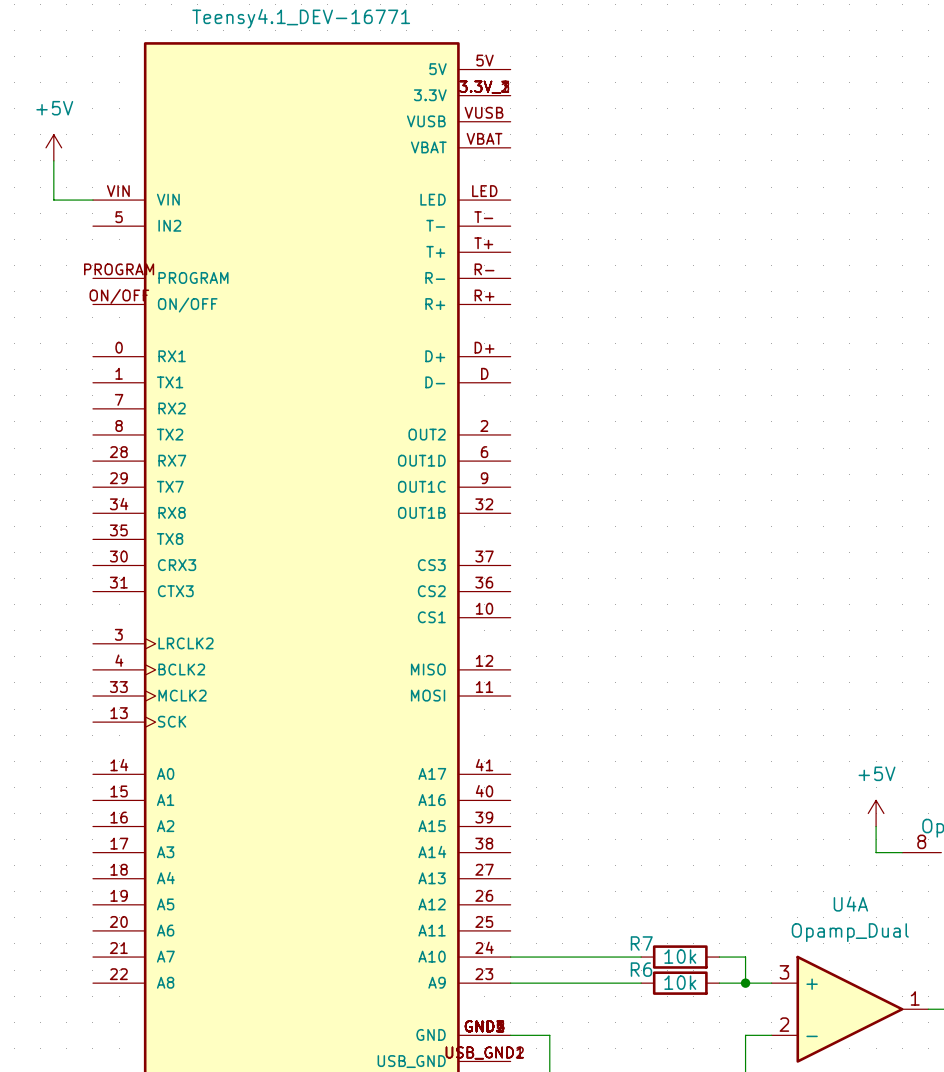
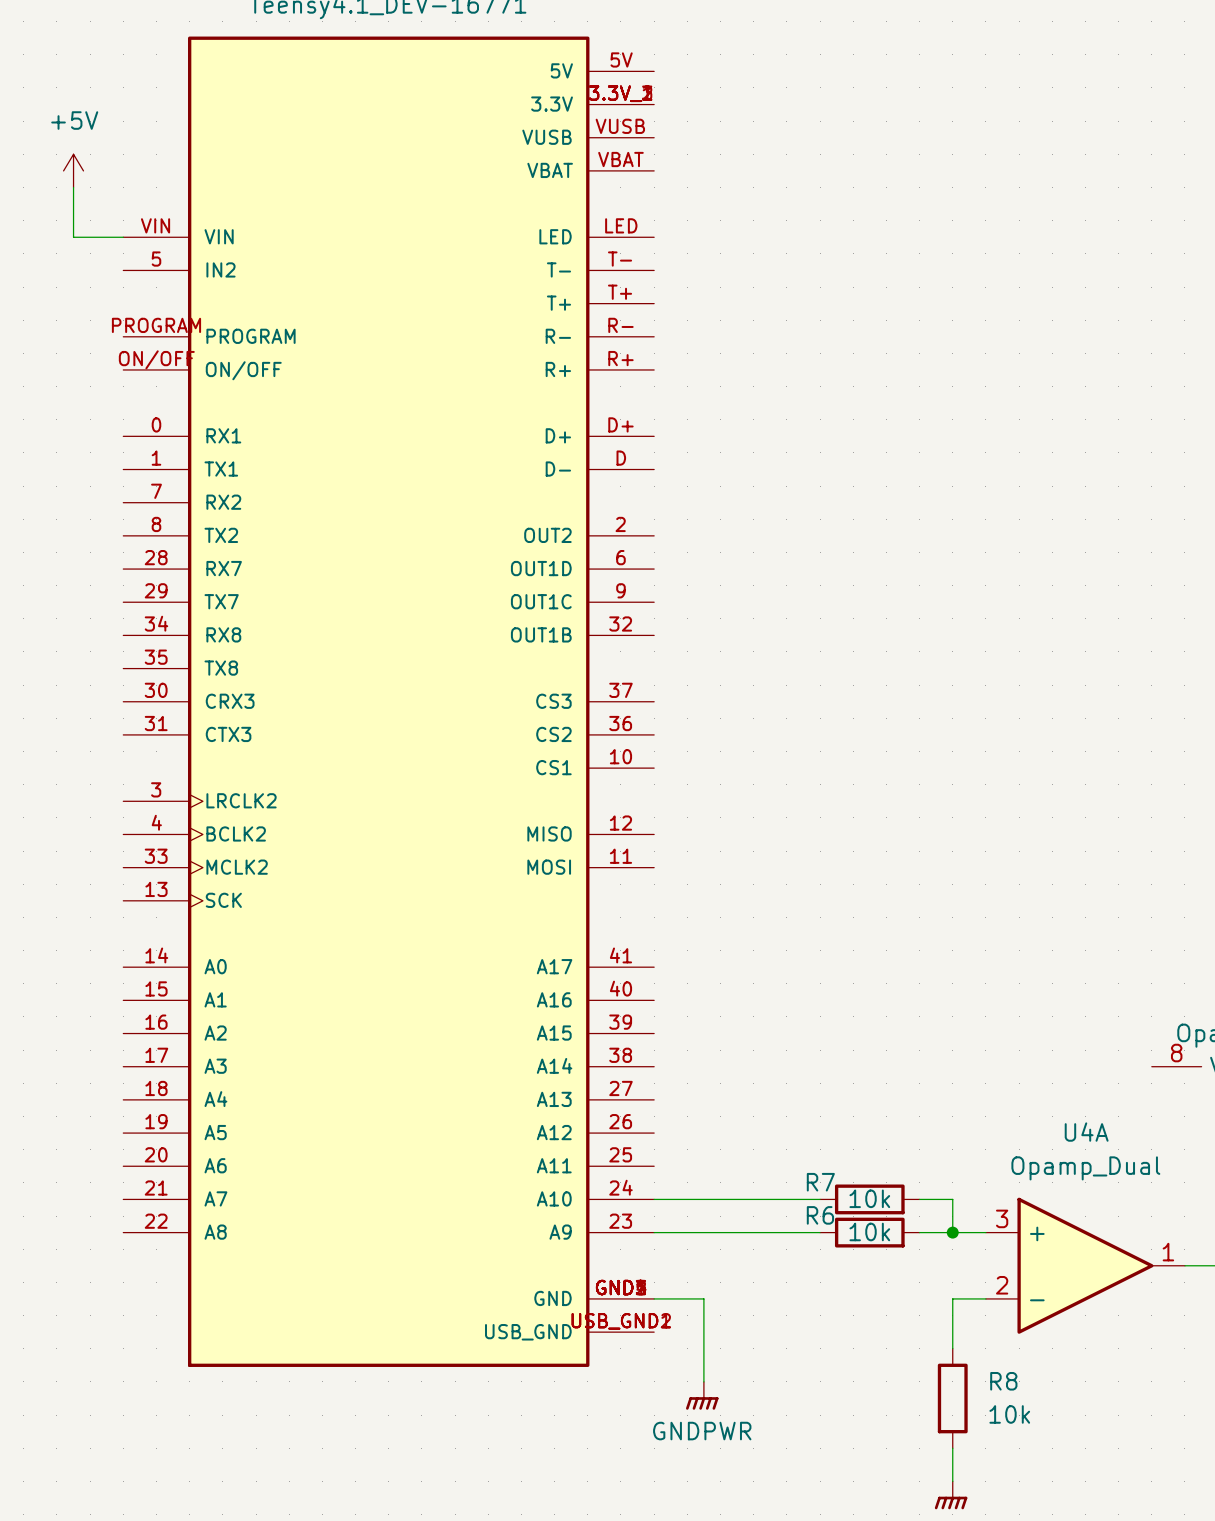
power symbol: +5V (876, 813) -> none
wire: (876, 826) (876, 852) (902, 852) -> none

